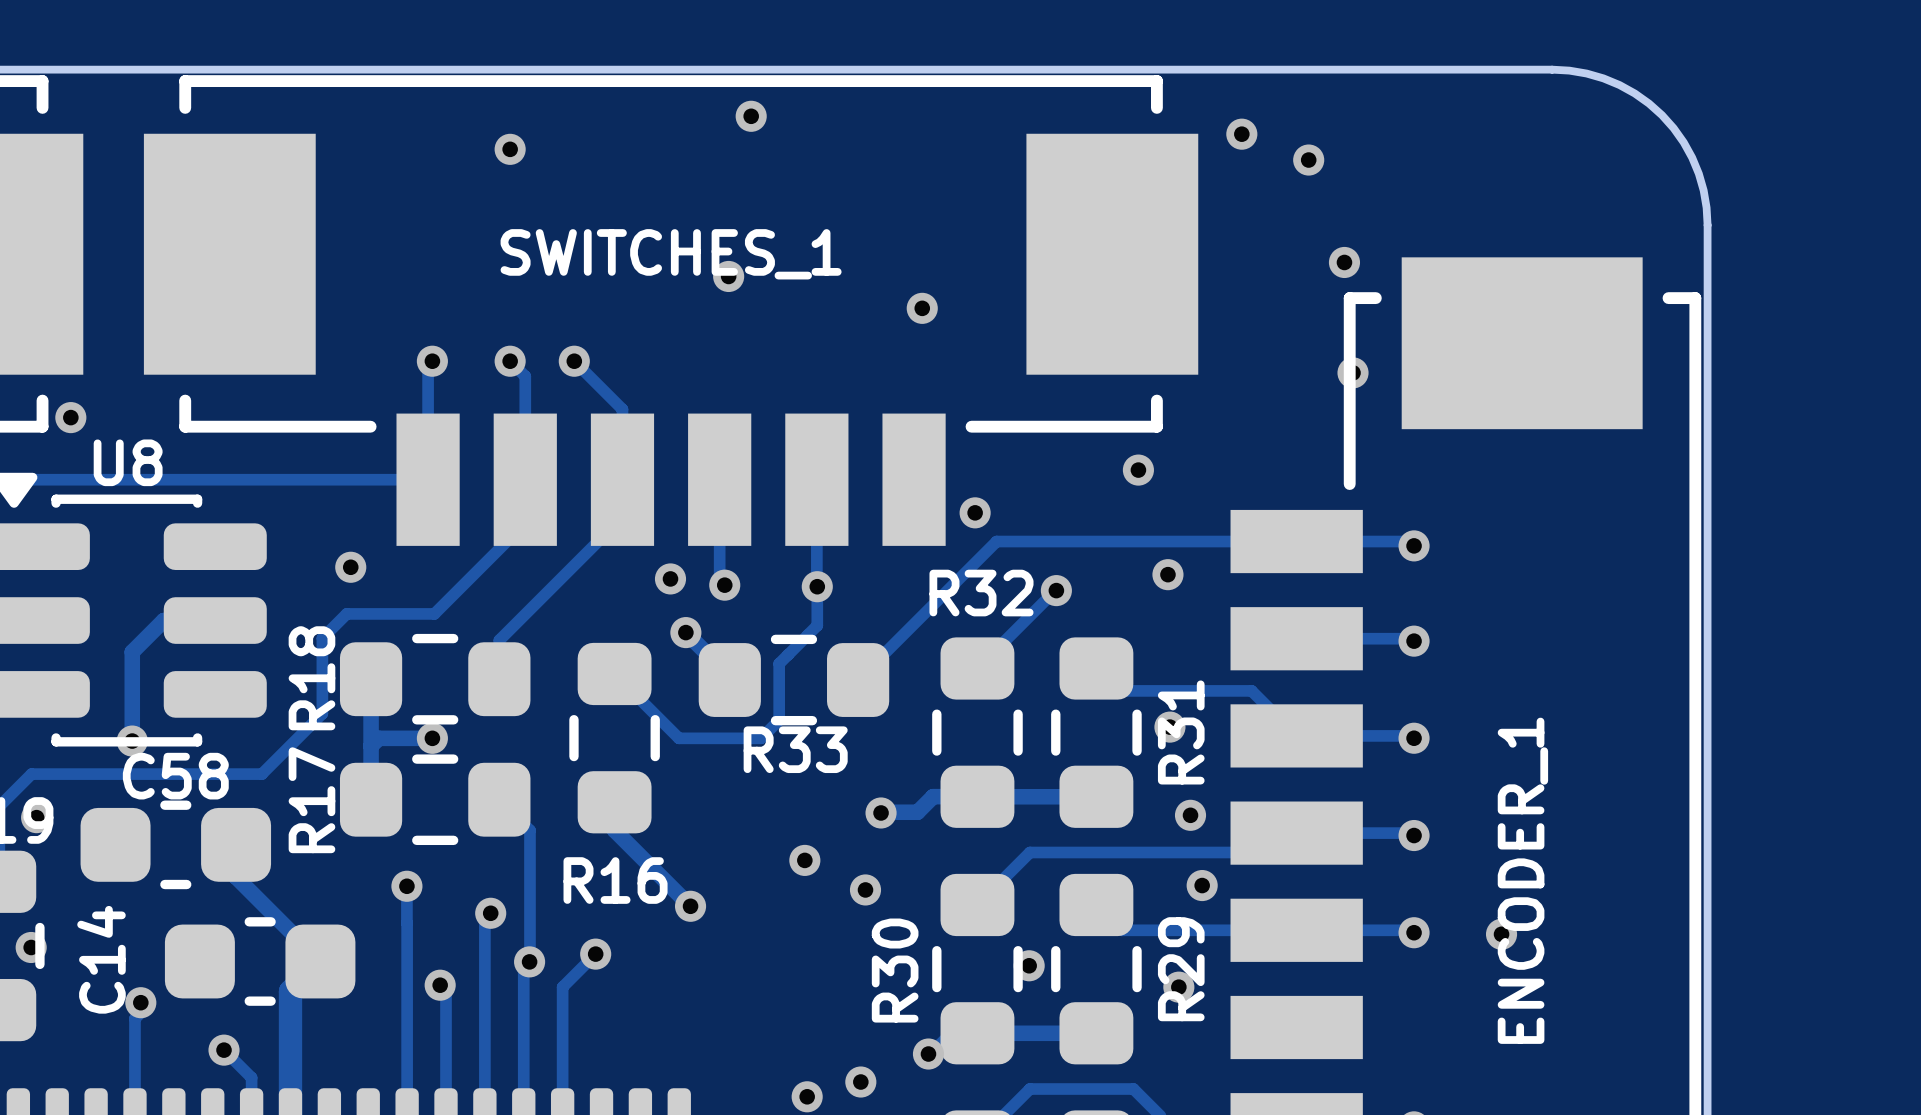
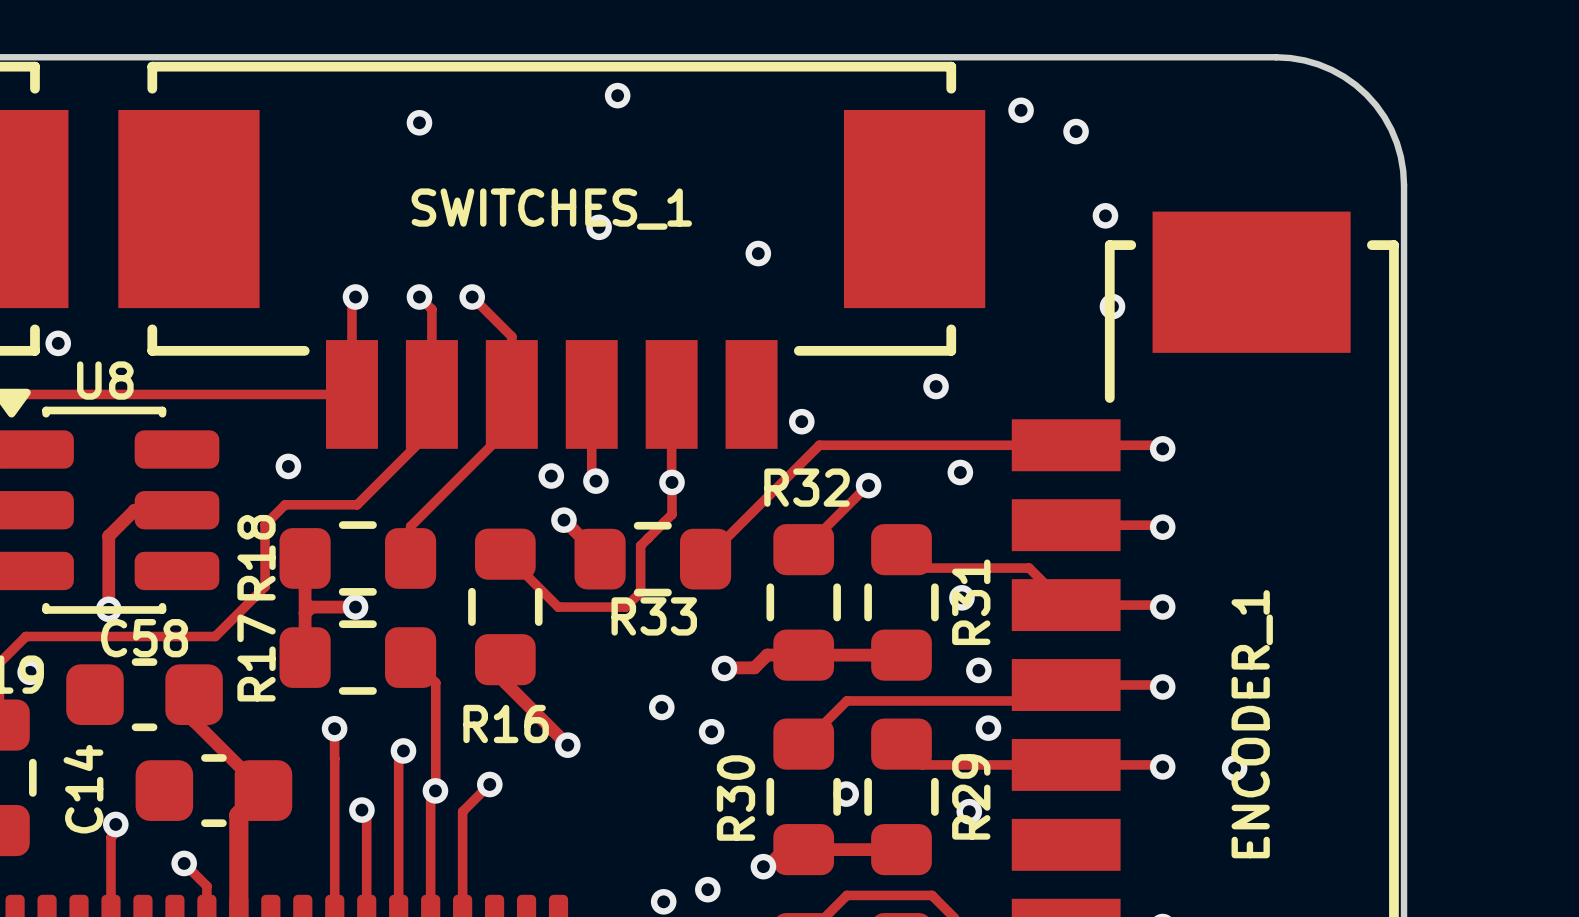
via: (31, 947) -> none

